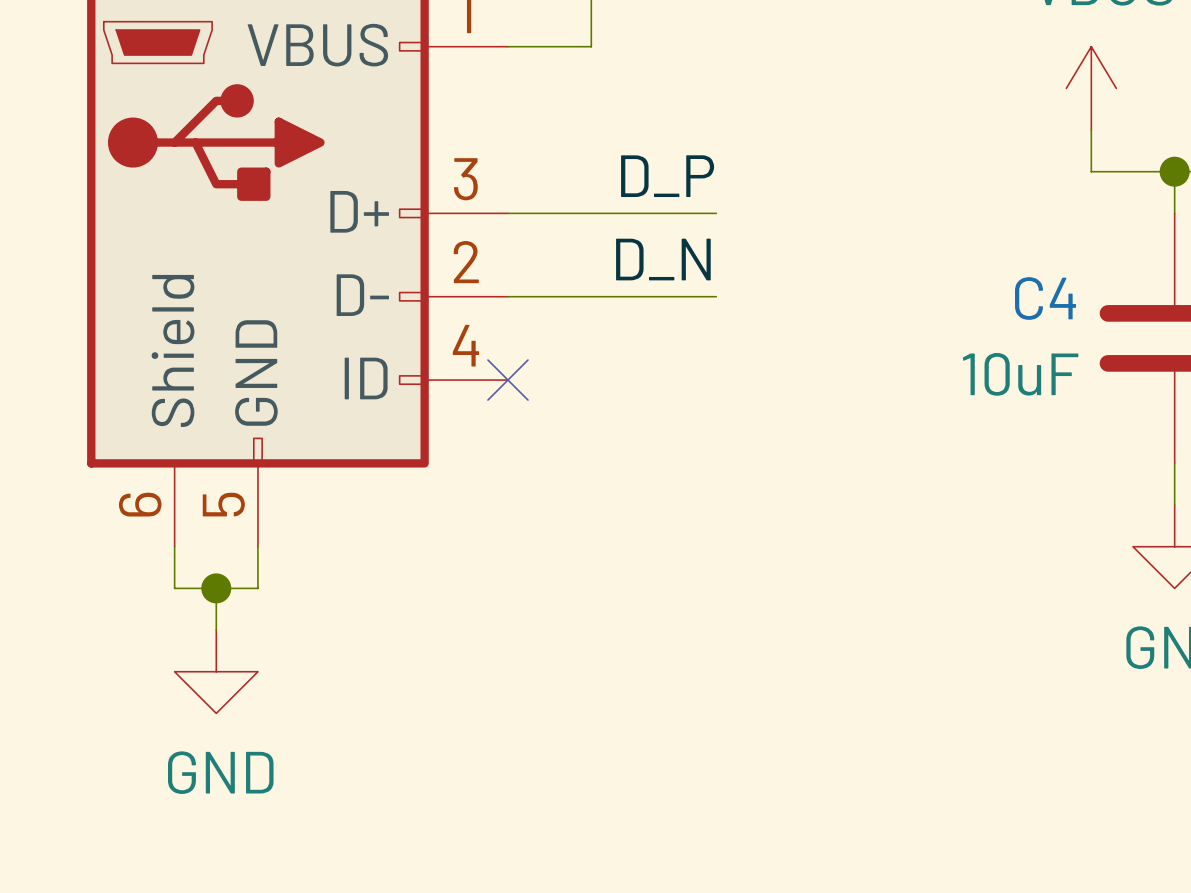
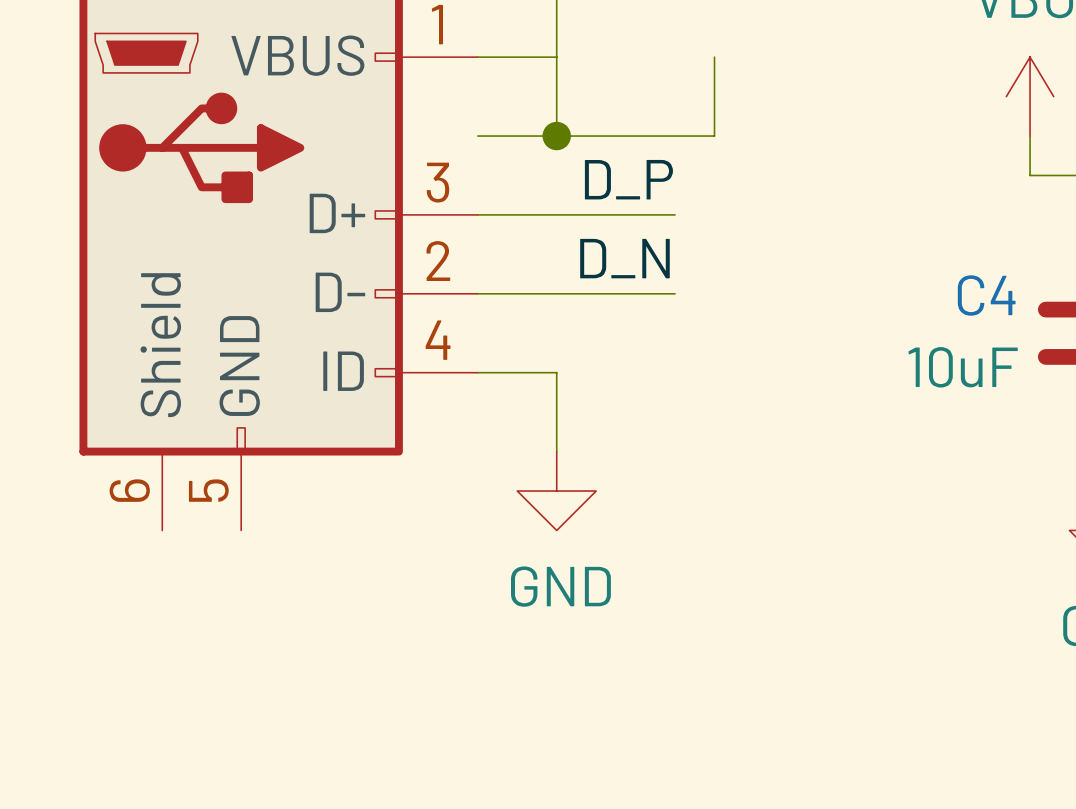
wire: none -> (556, 57) (556, 136)
wire: none -> (714, 57) (714, 136) (477, 136)
junction: none -> (556, 136)
wire: none -> (477, 372) (556, 372) (556, 451)
no-connect mark: (507, 380) -> none
wire: (174, 546) (174, 588) (257, 588) (257, 546) -> none
wire: (216, 588) (216, 630) -> none
junction: (216, 588) -> none
power symbol position: GND (216, 671) -> GND (556, 491)

